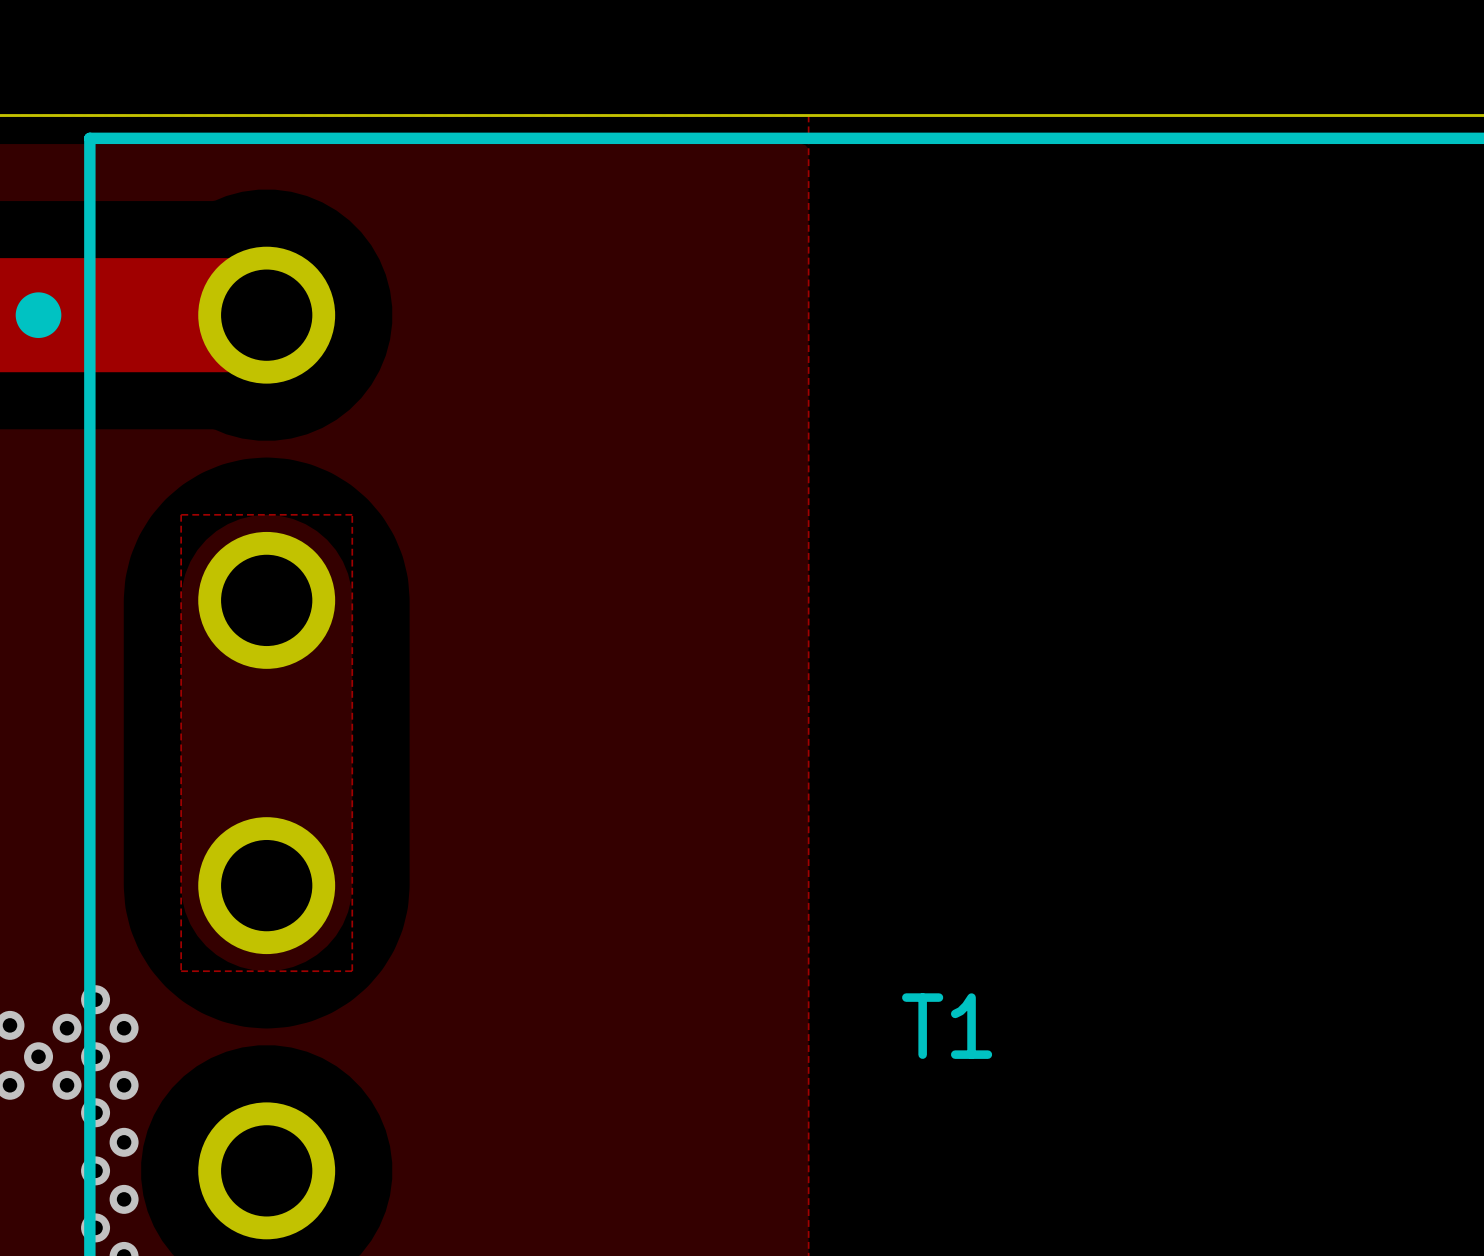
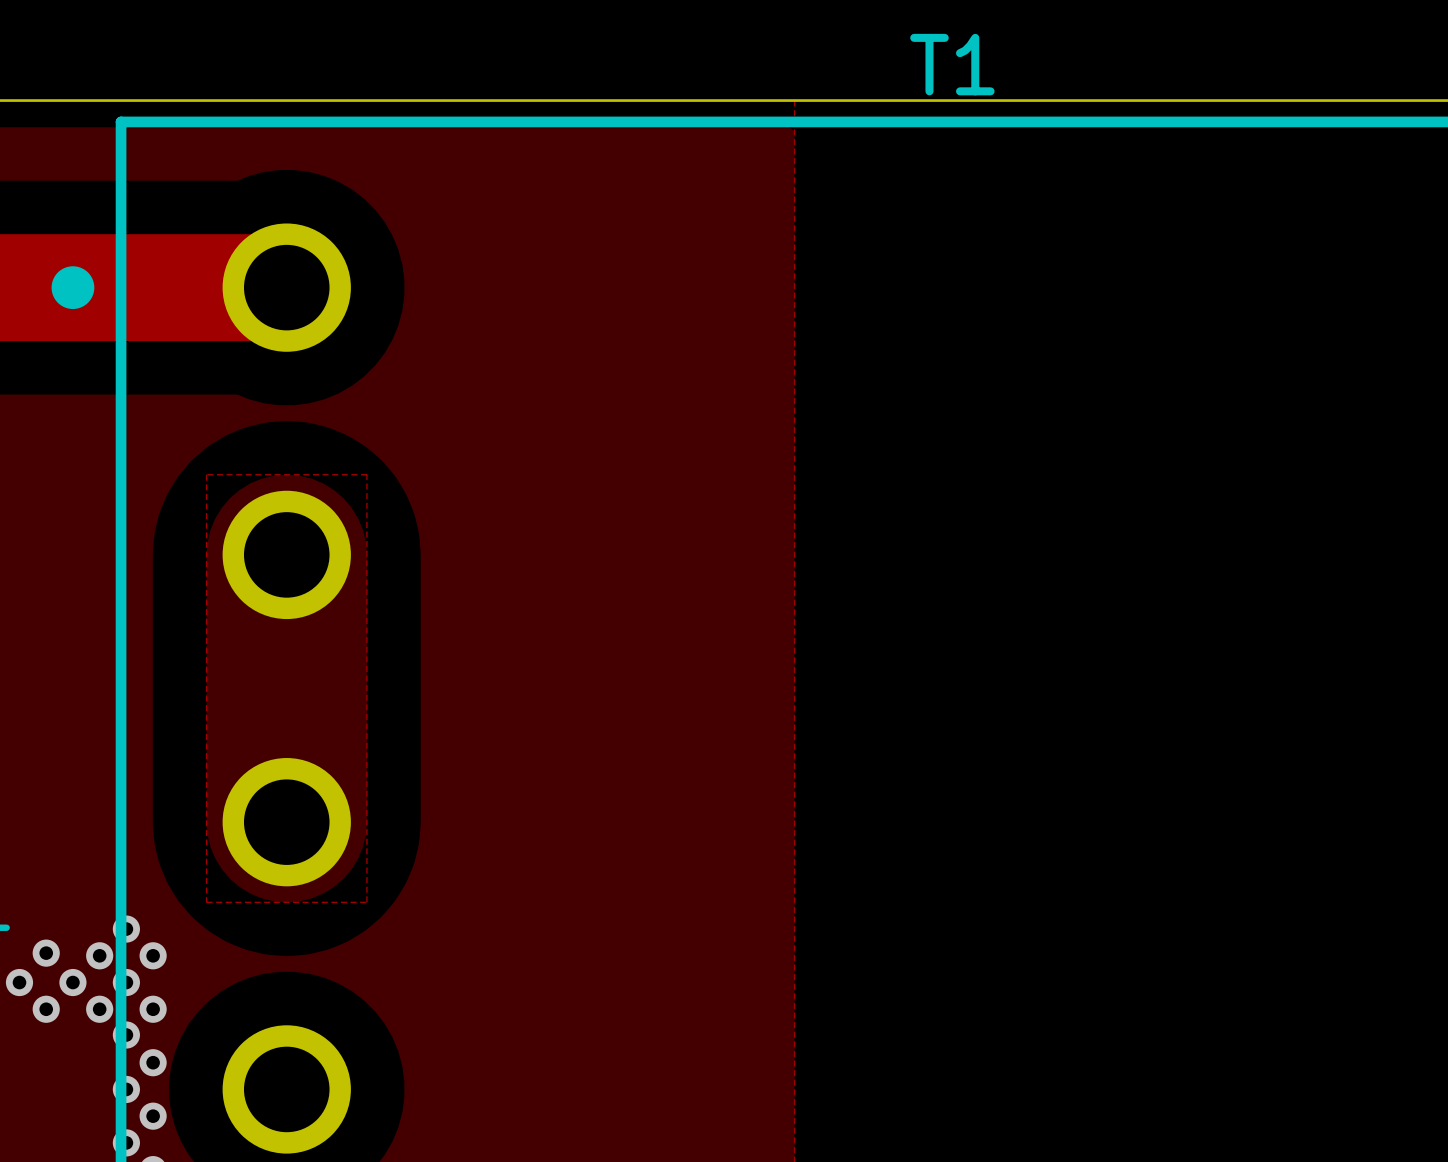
T1 name position: T1 (947, 1026) -> T1 (952, 64)

